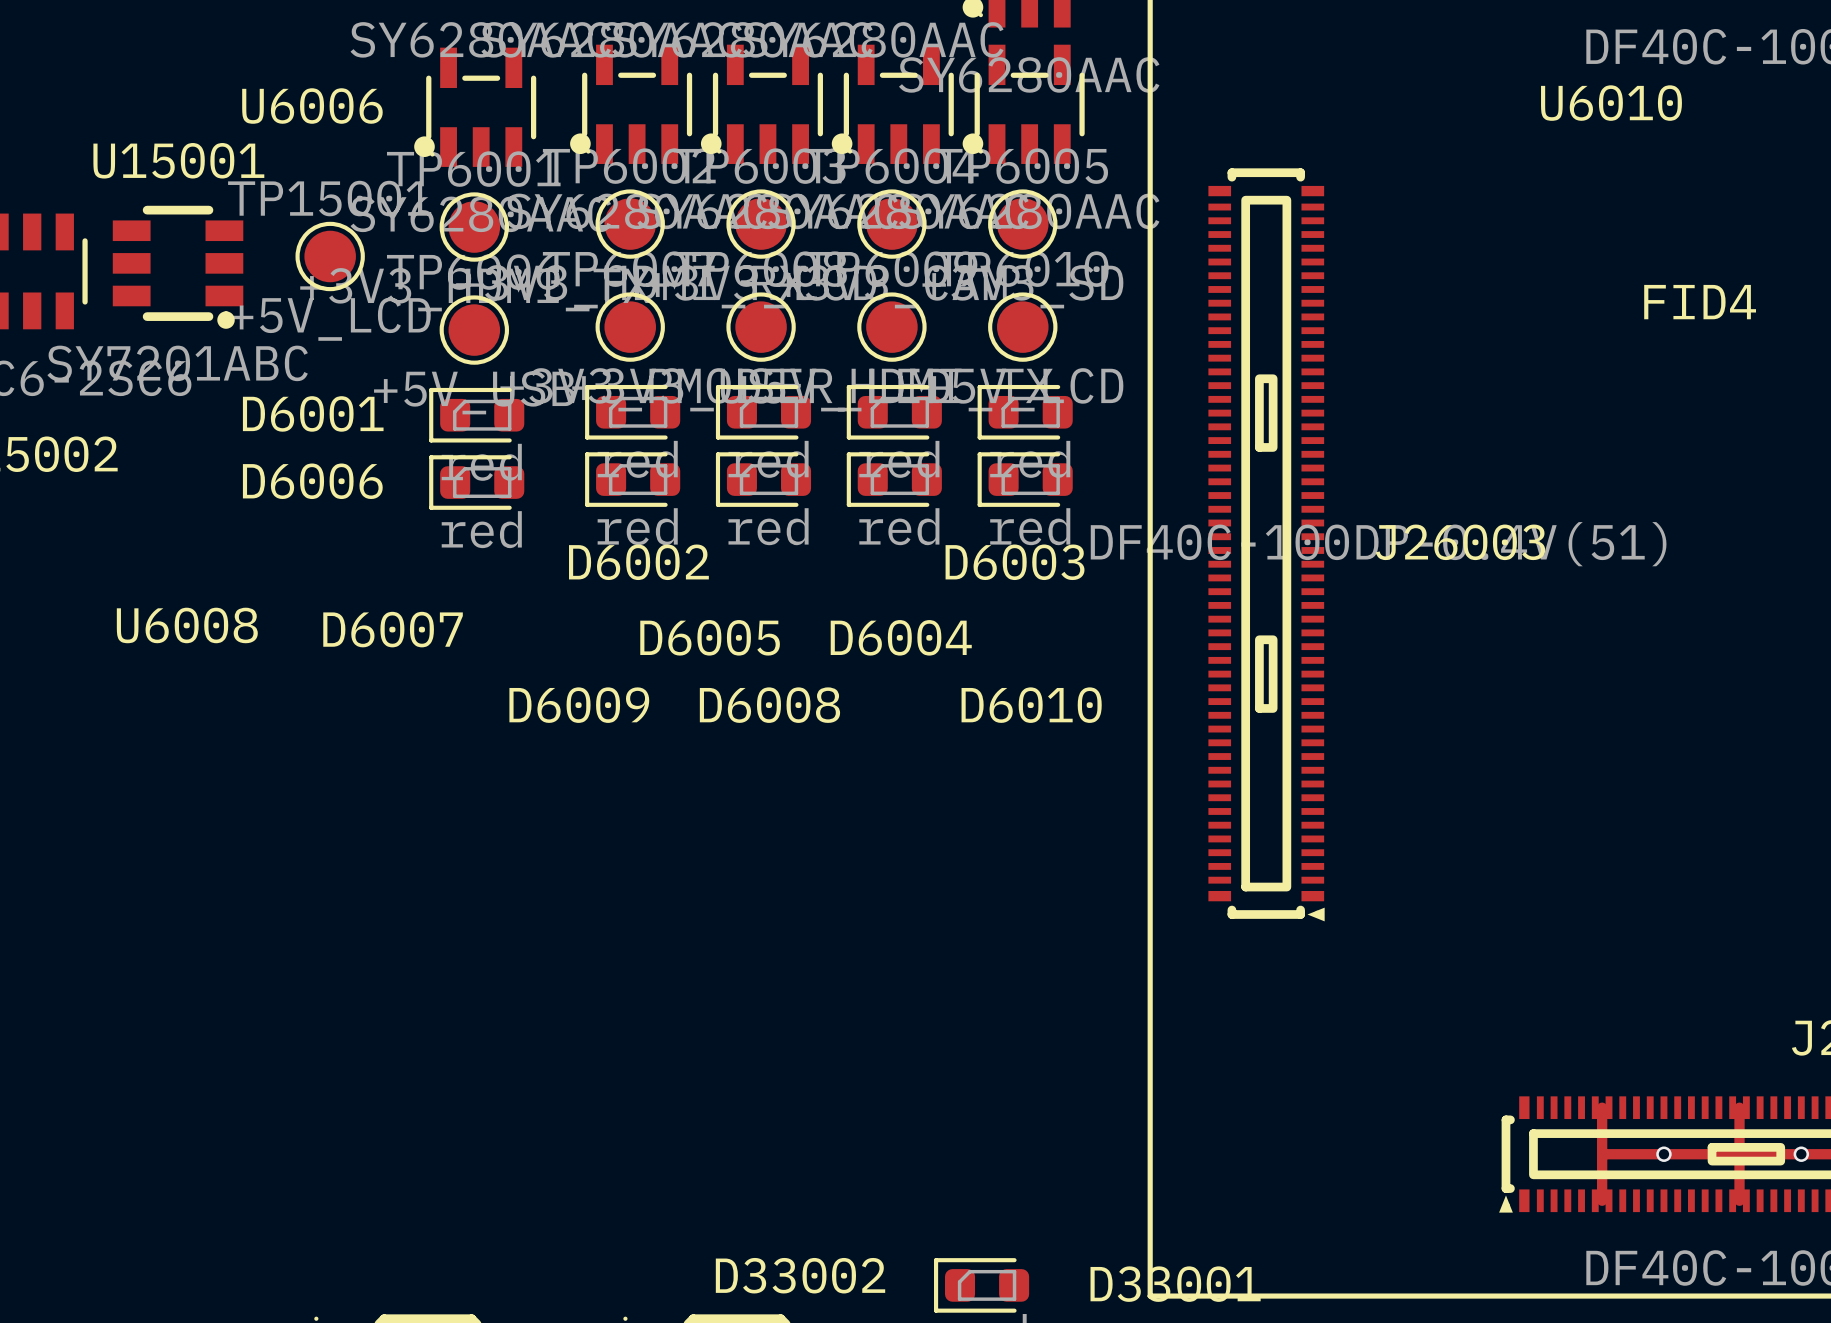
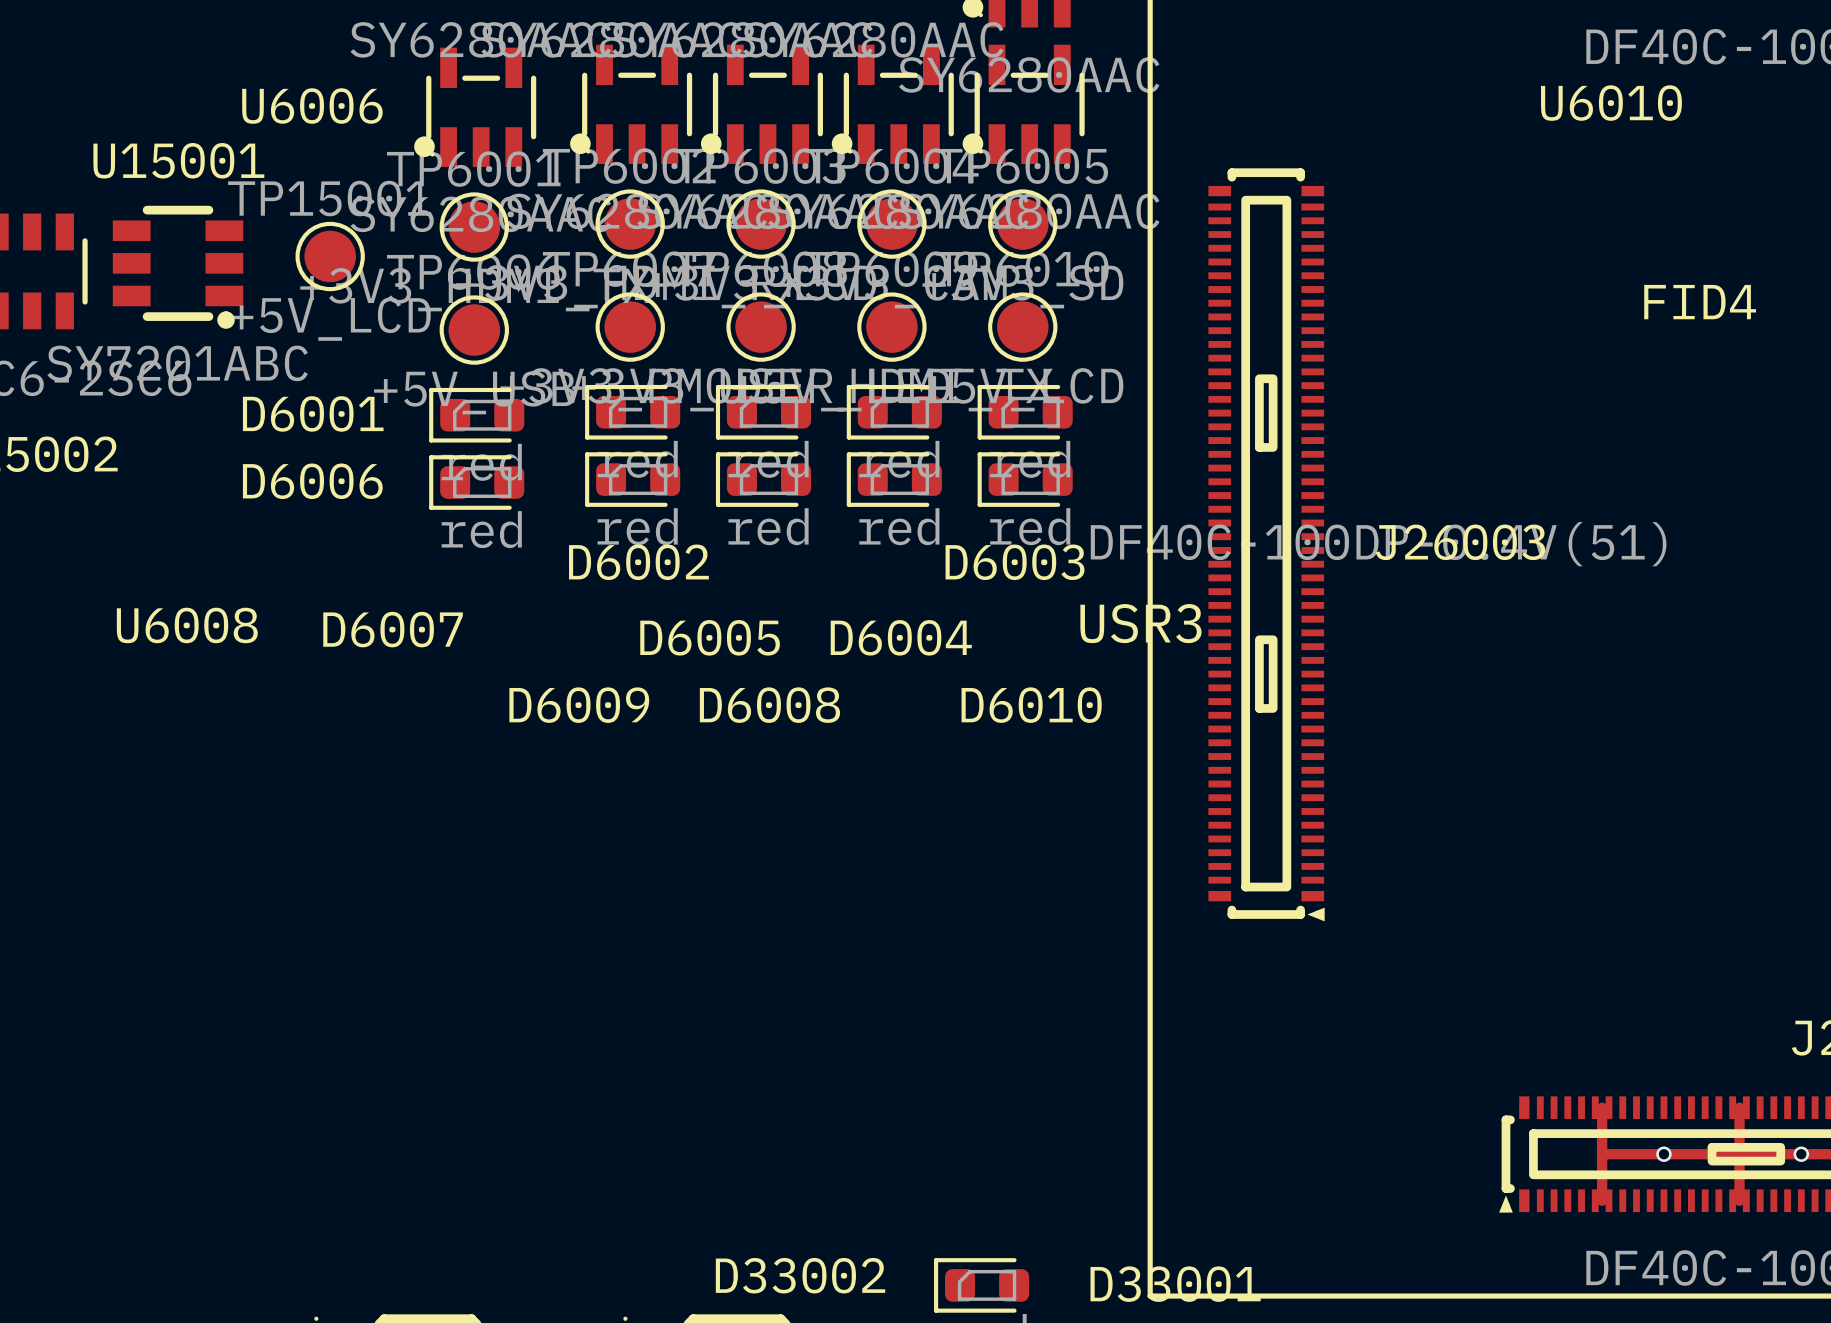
text: none -> USR3 (1140, 623)

